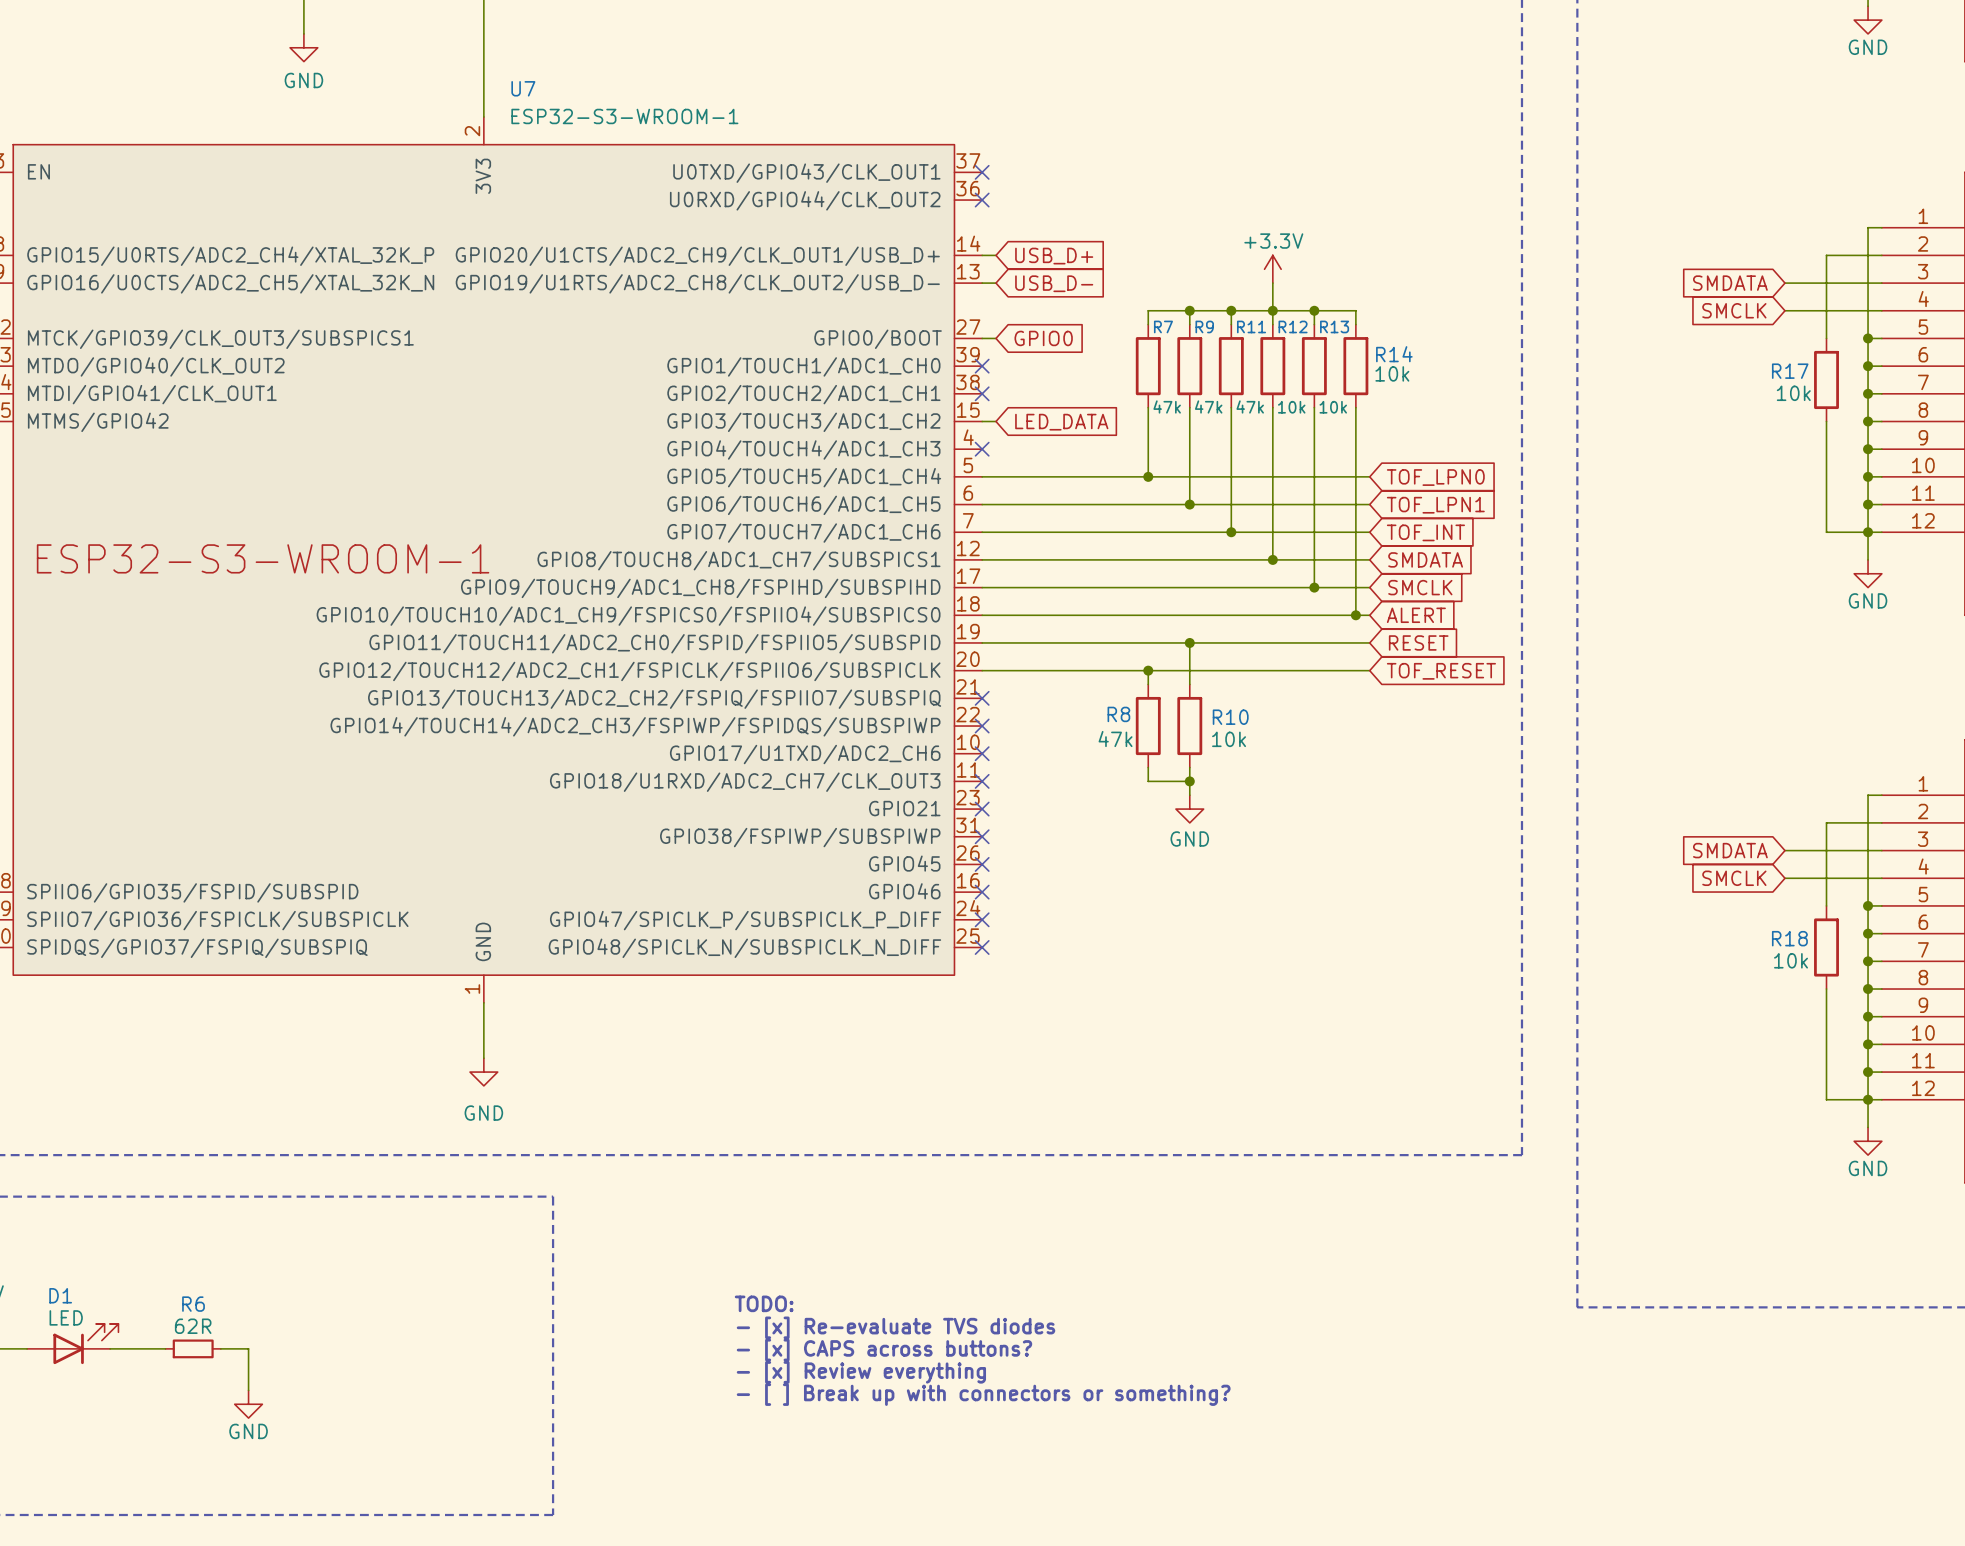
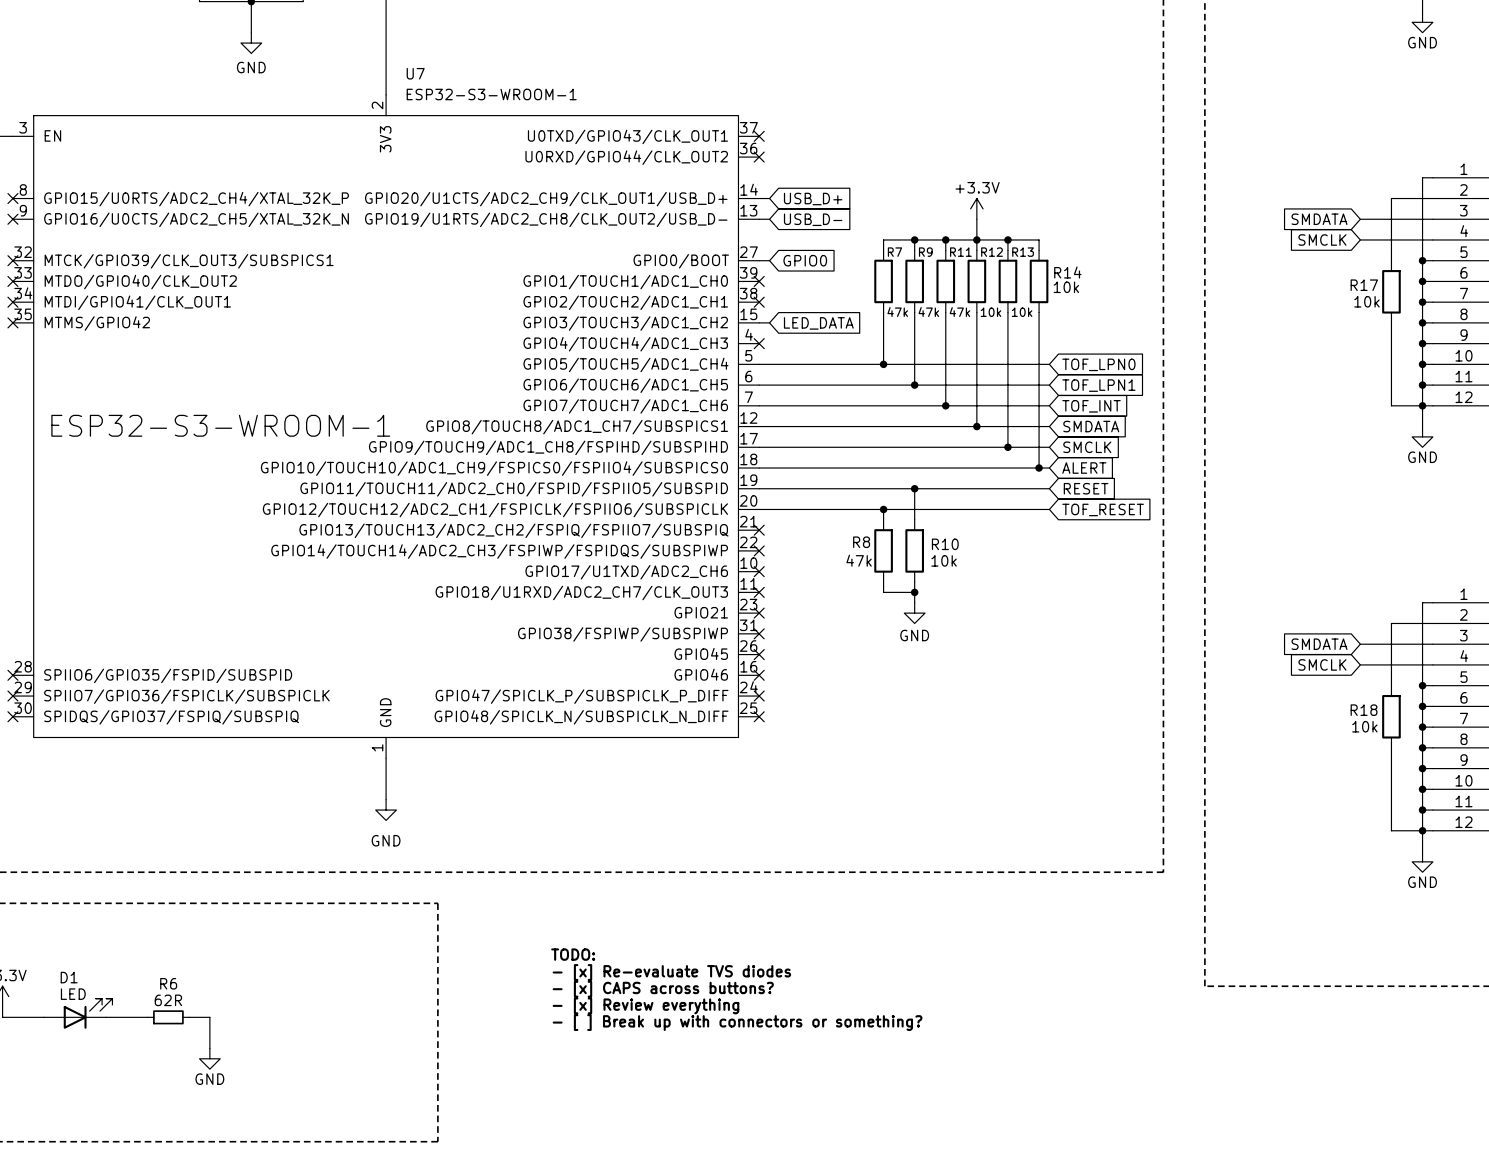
text position: TODO: (764, 1303) -> TODO: (573, 954)
text position: - [x] Re-evaluate TVS diodes (895, 1327) -> - [x] Re-evaluate TVS diodes (671, 972)
text position: - [x] CAPS across buttons? (884, 1350) -> - [x] CAPS across buttons? (663, 989)
text position: - [x] Review everything (861, 1372) -> - [x] Review everything (645, 1005)
text position: - [ ] Break up with connectors or something? (983, 1394) -> - [ ] Break up with connectors or something? (737, 1022)

